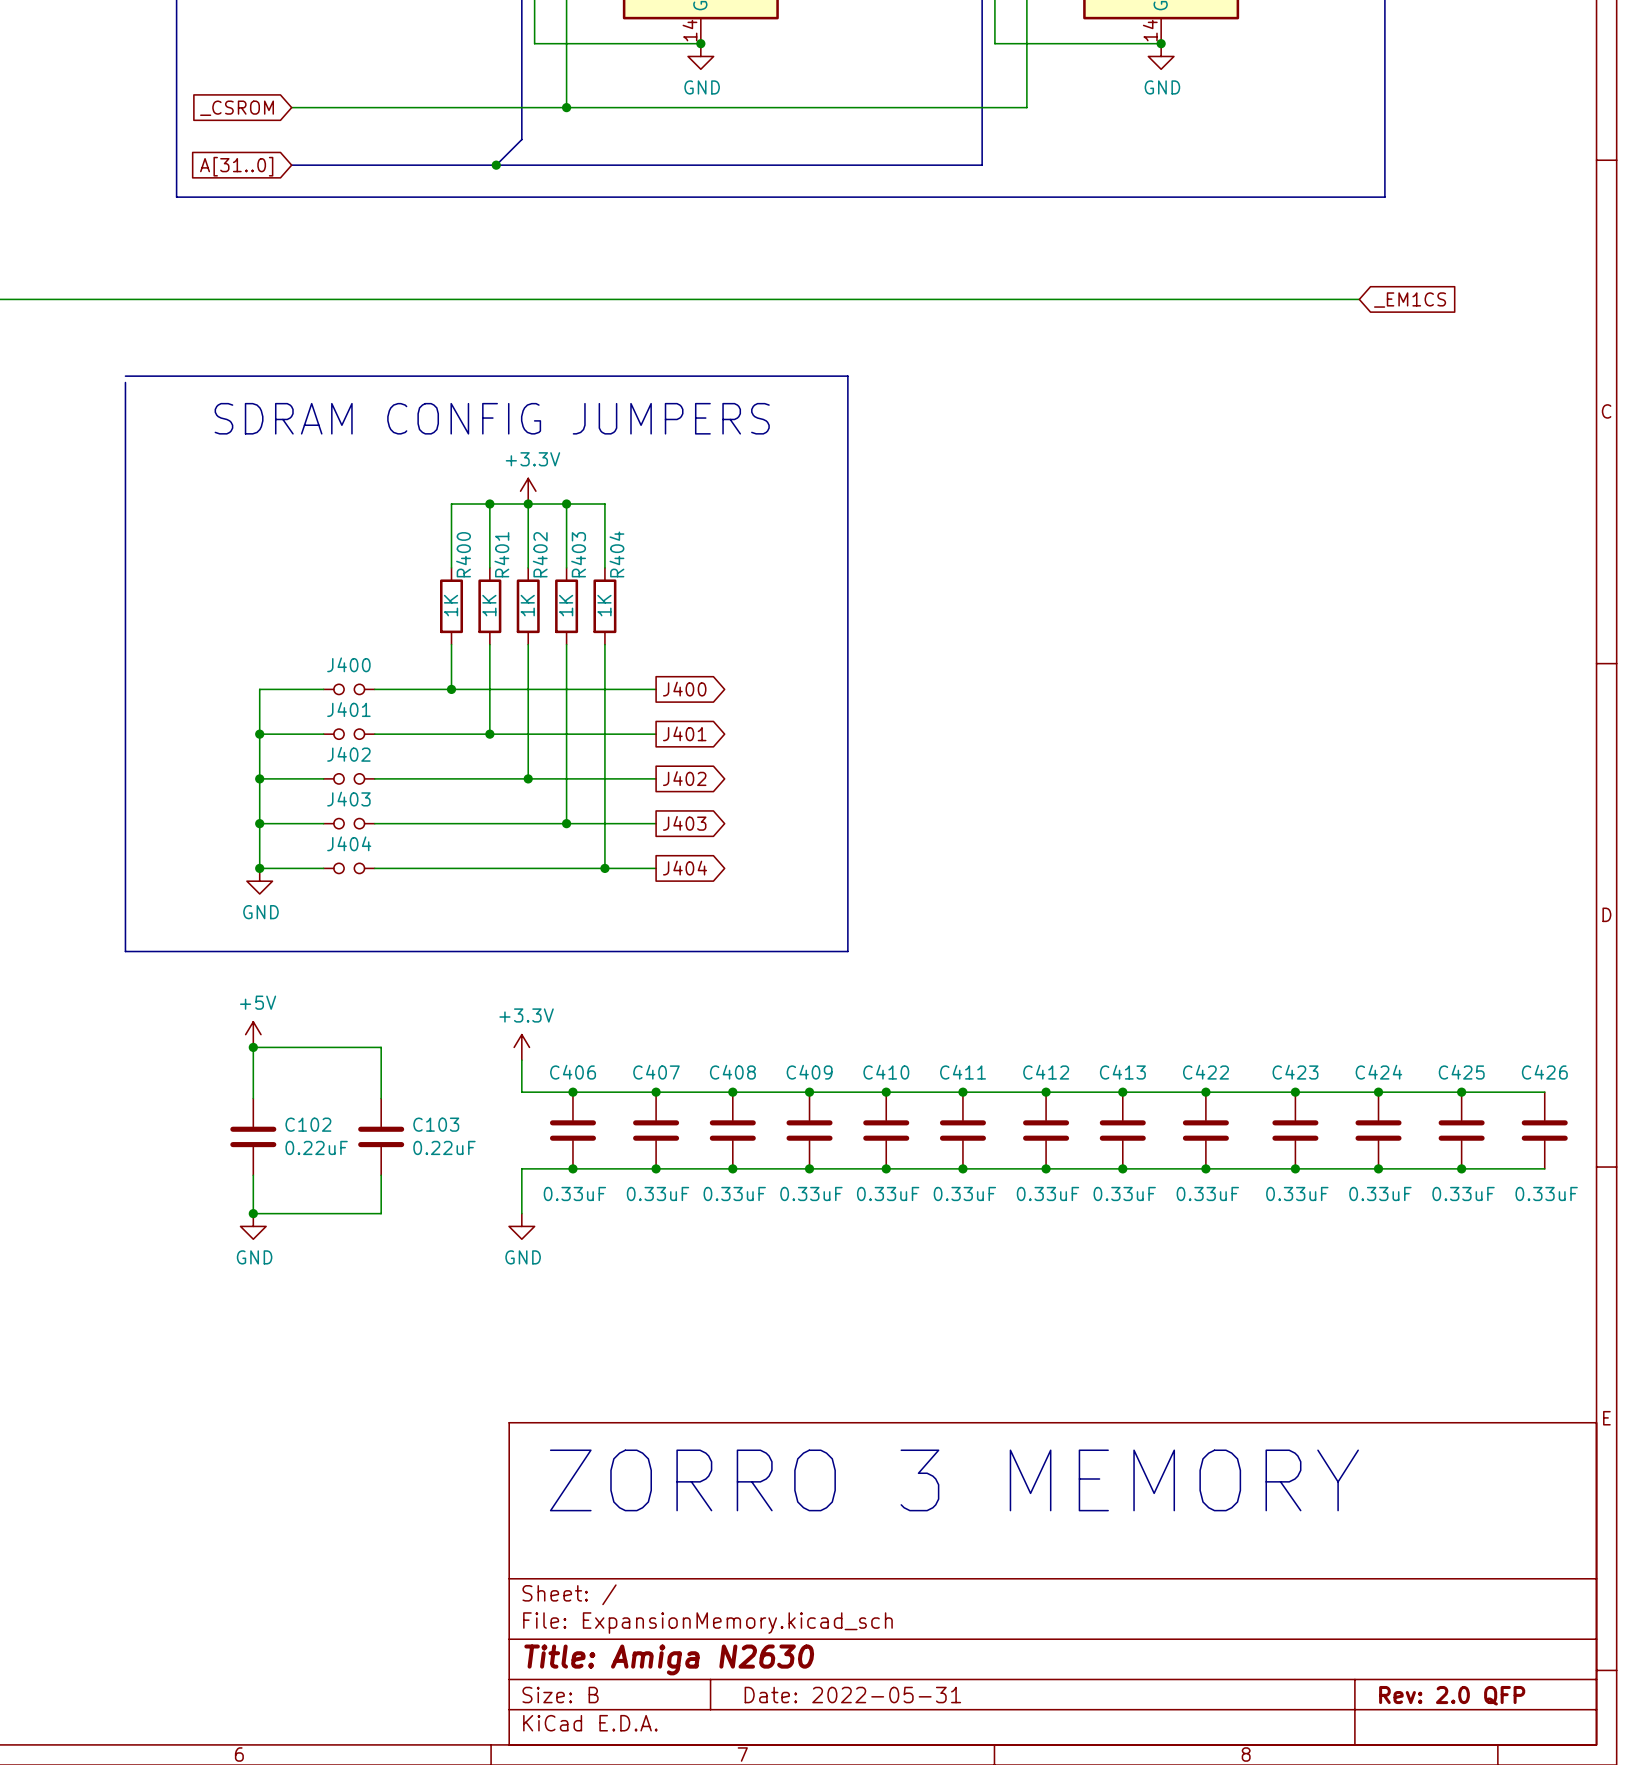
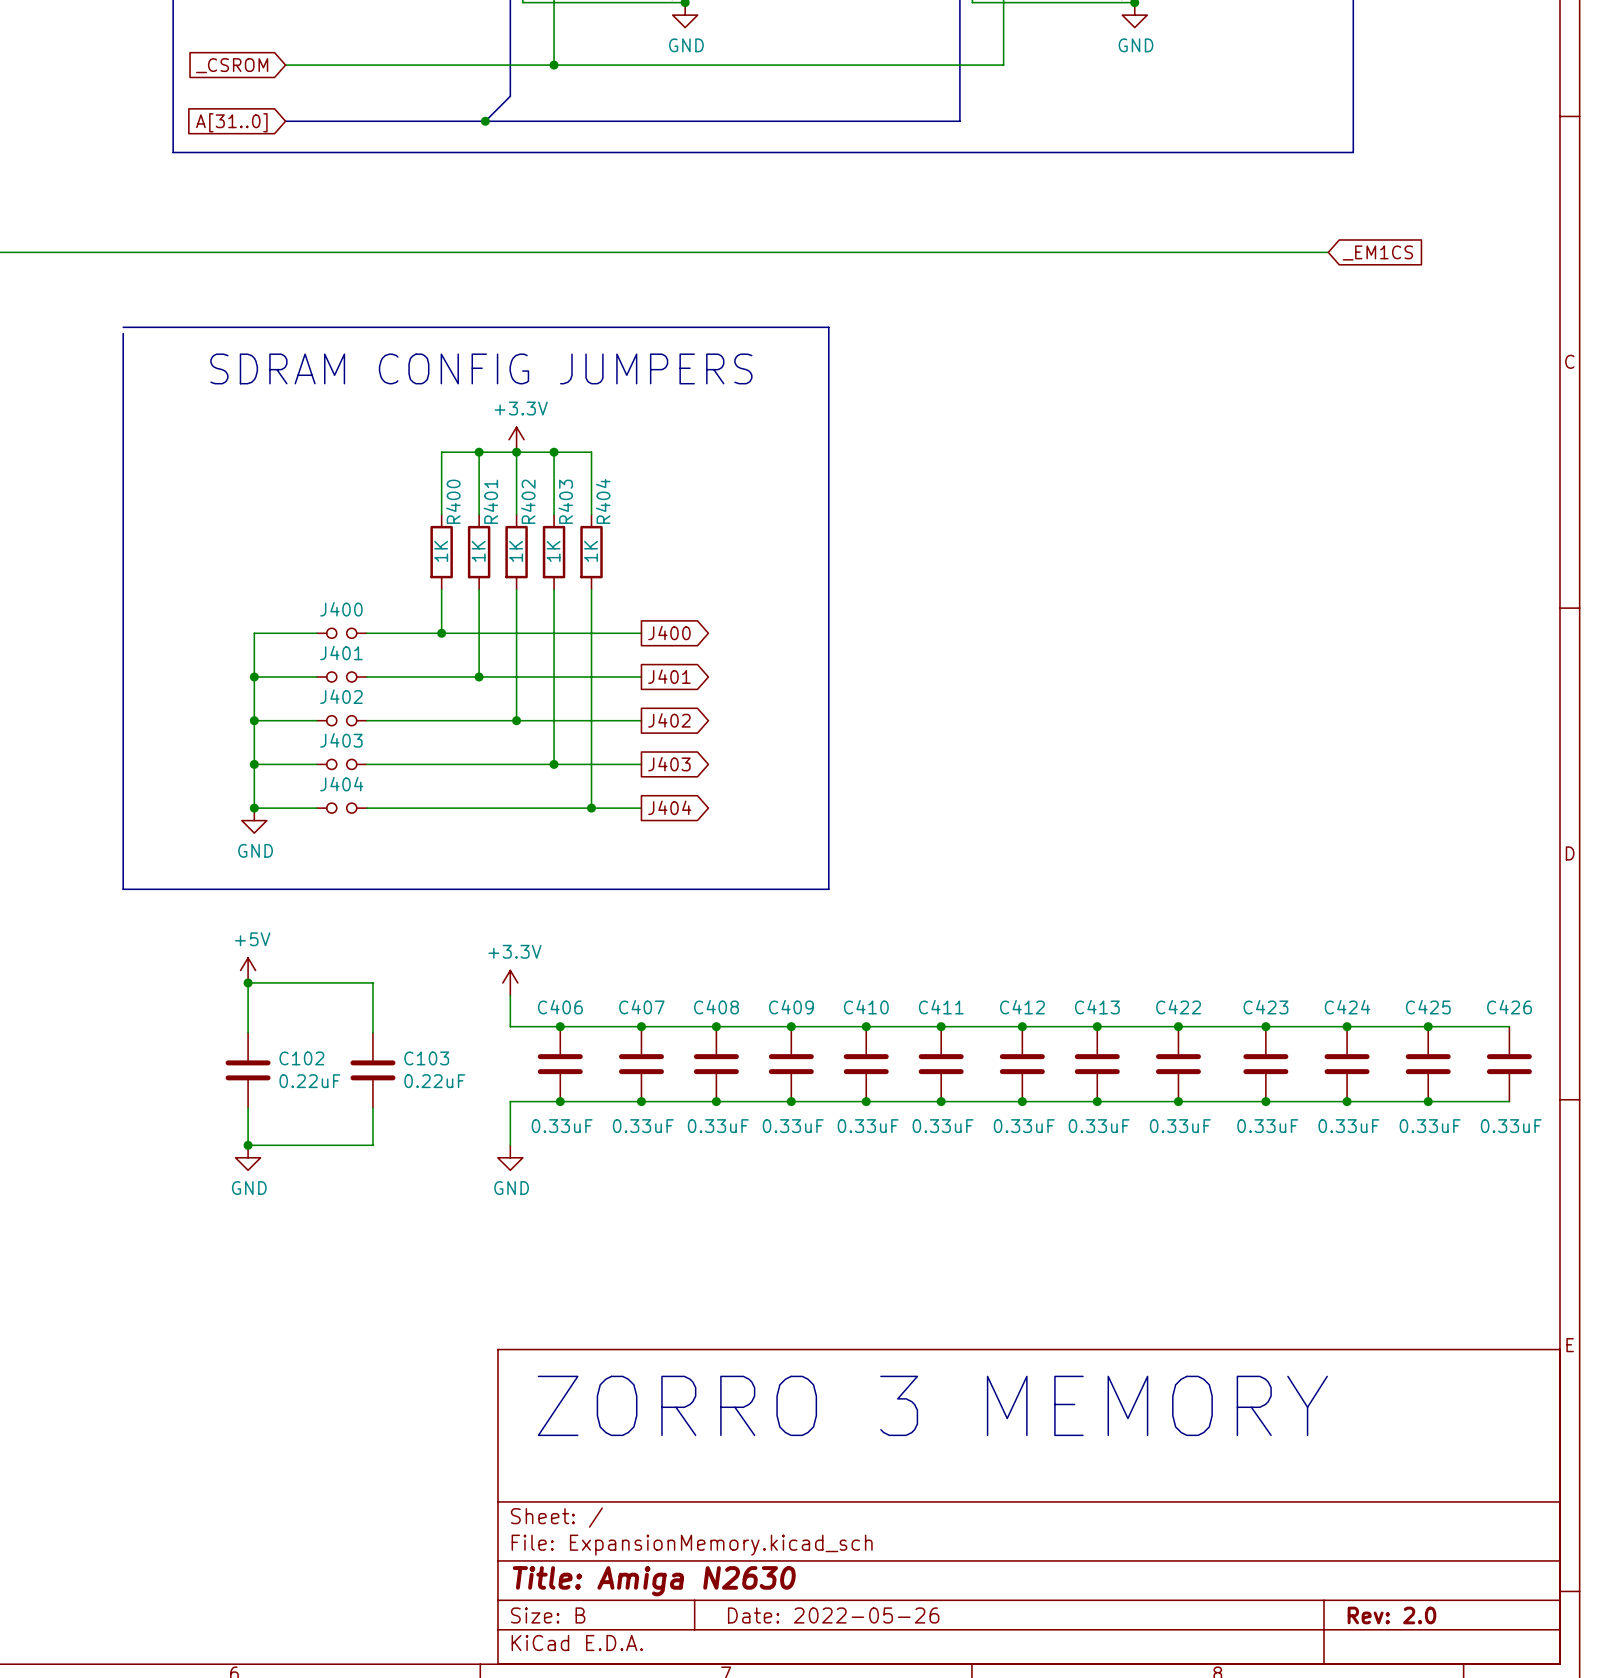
title block: Date: 2022-05-31 (852, 1695) -> Date: 2022-05-26 (833, 1615)
title block: Rev: 2.0 QFP (1452, 1695) -> Rev: 2.0 (1391, 1615)

